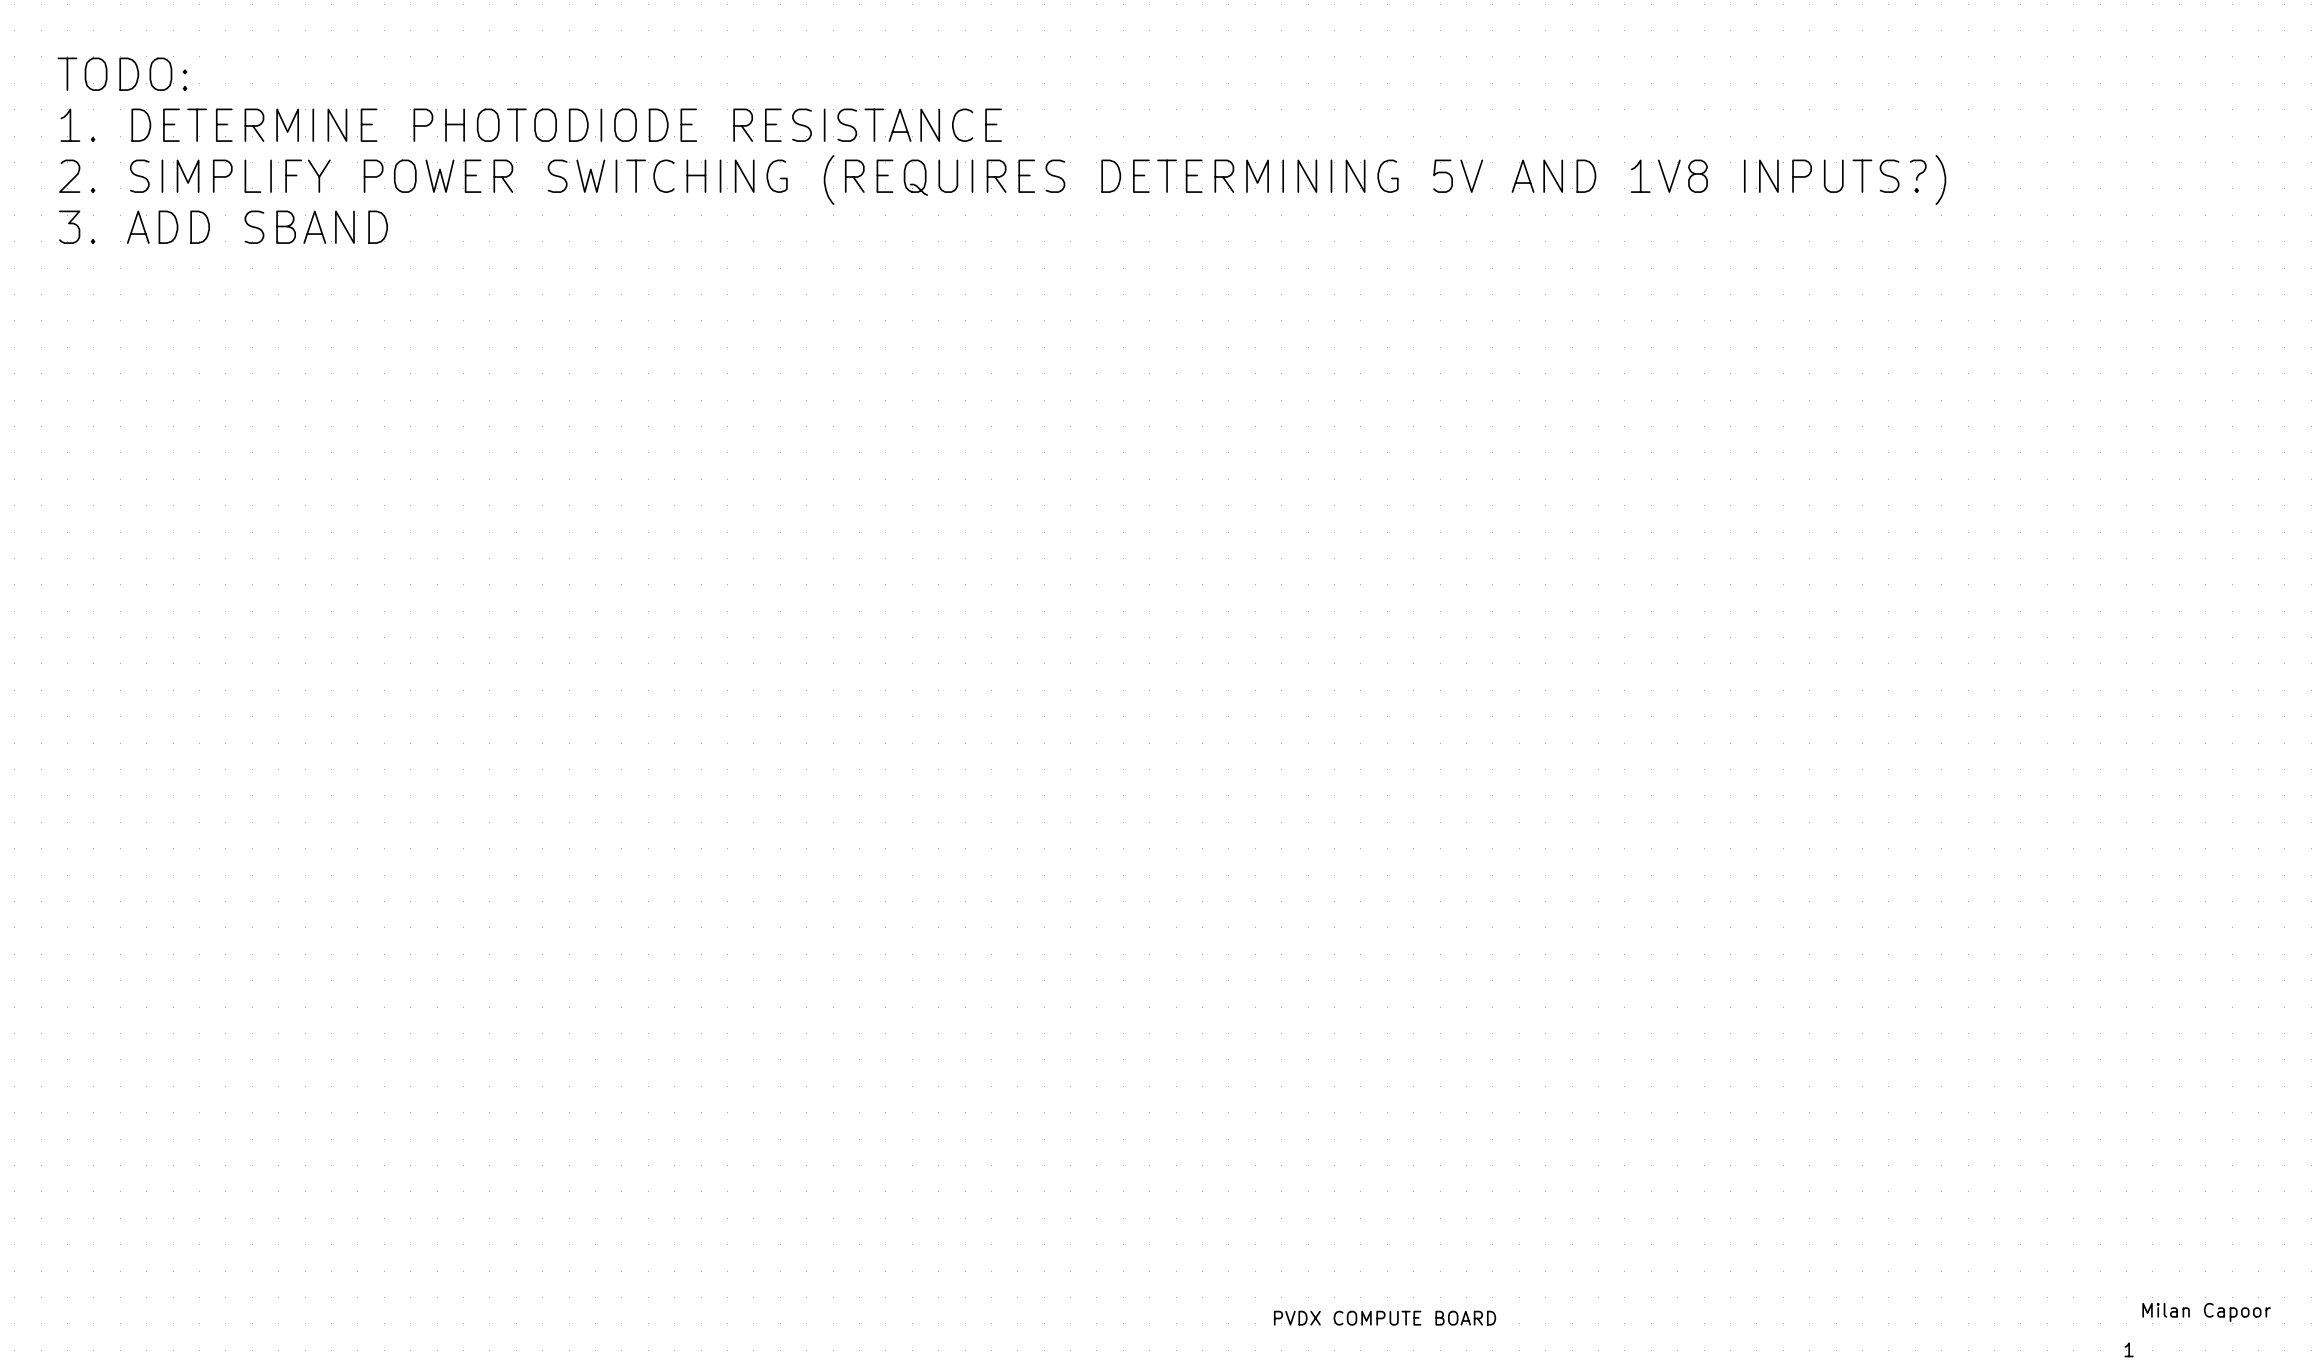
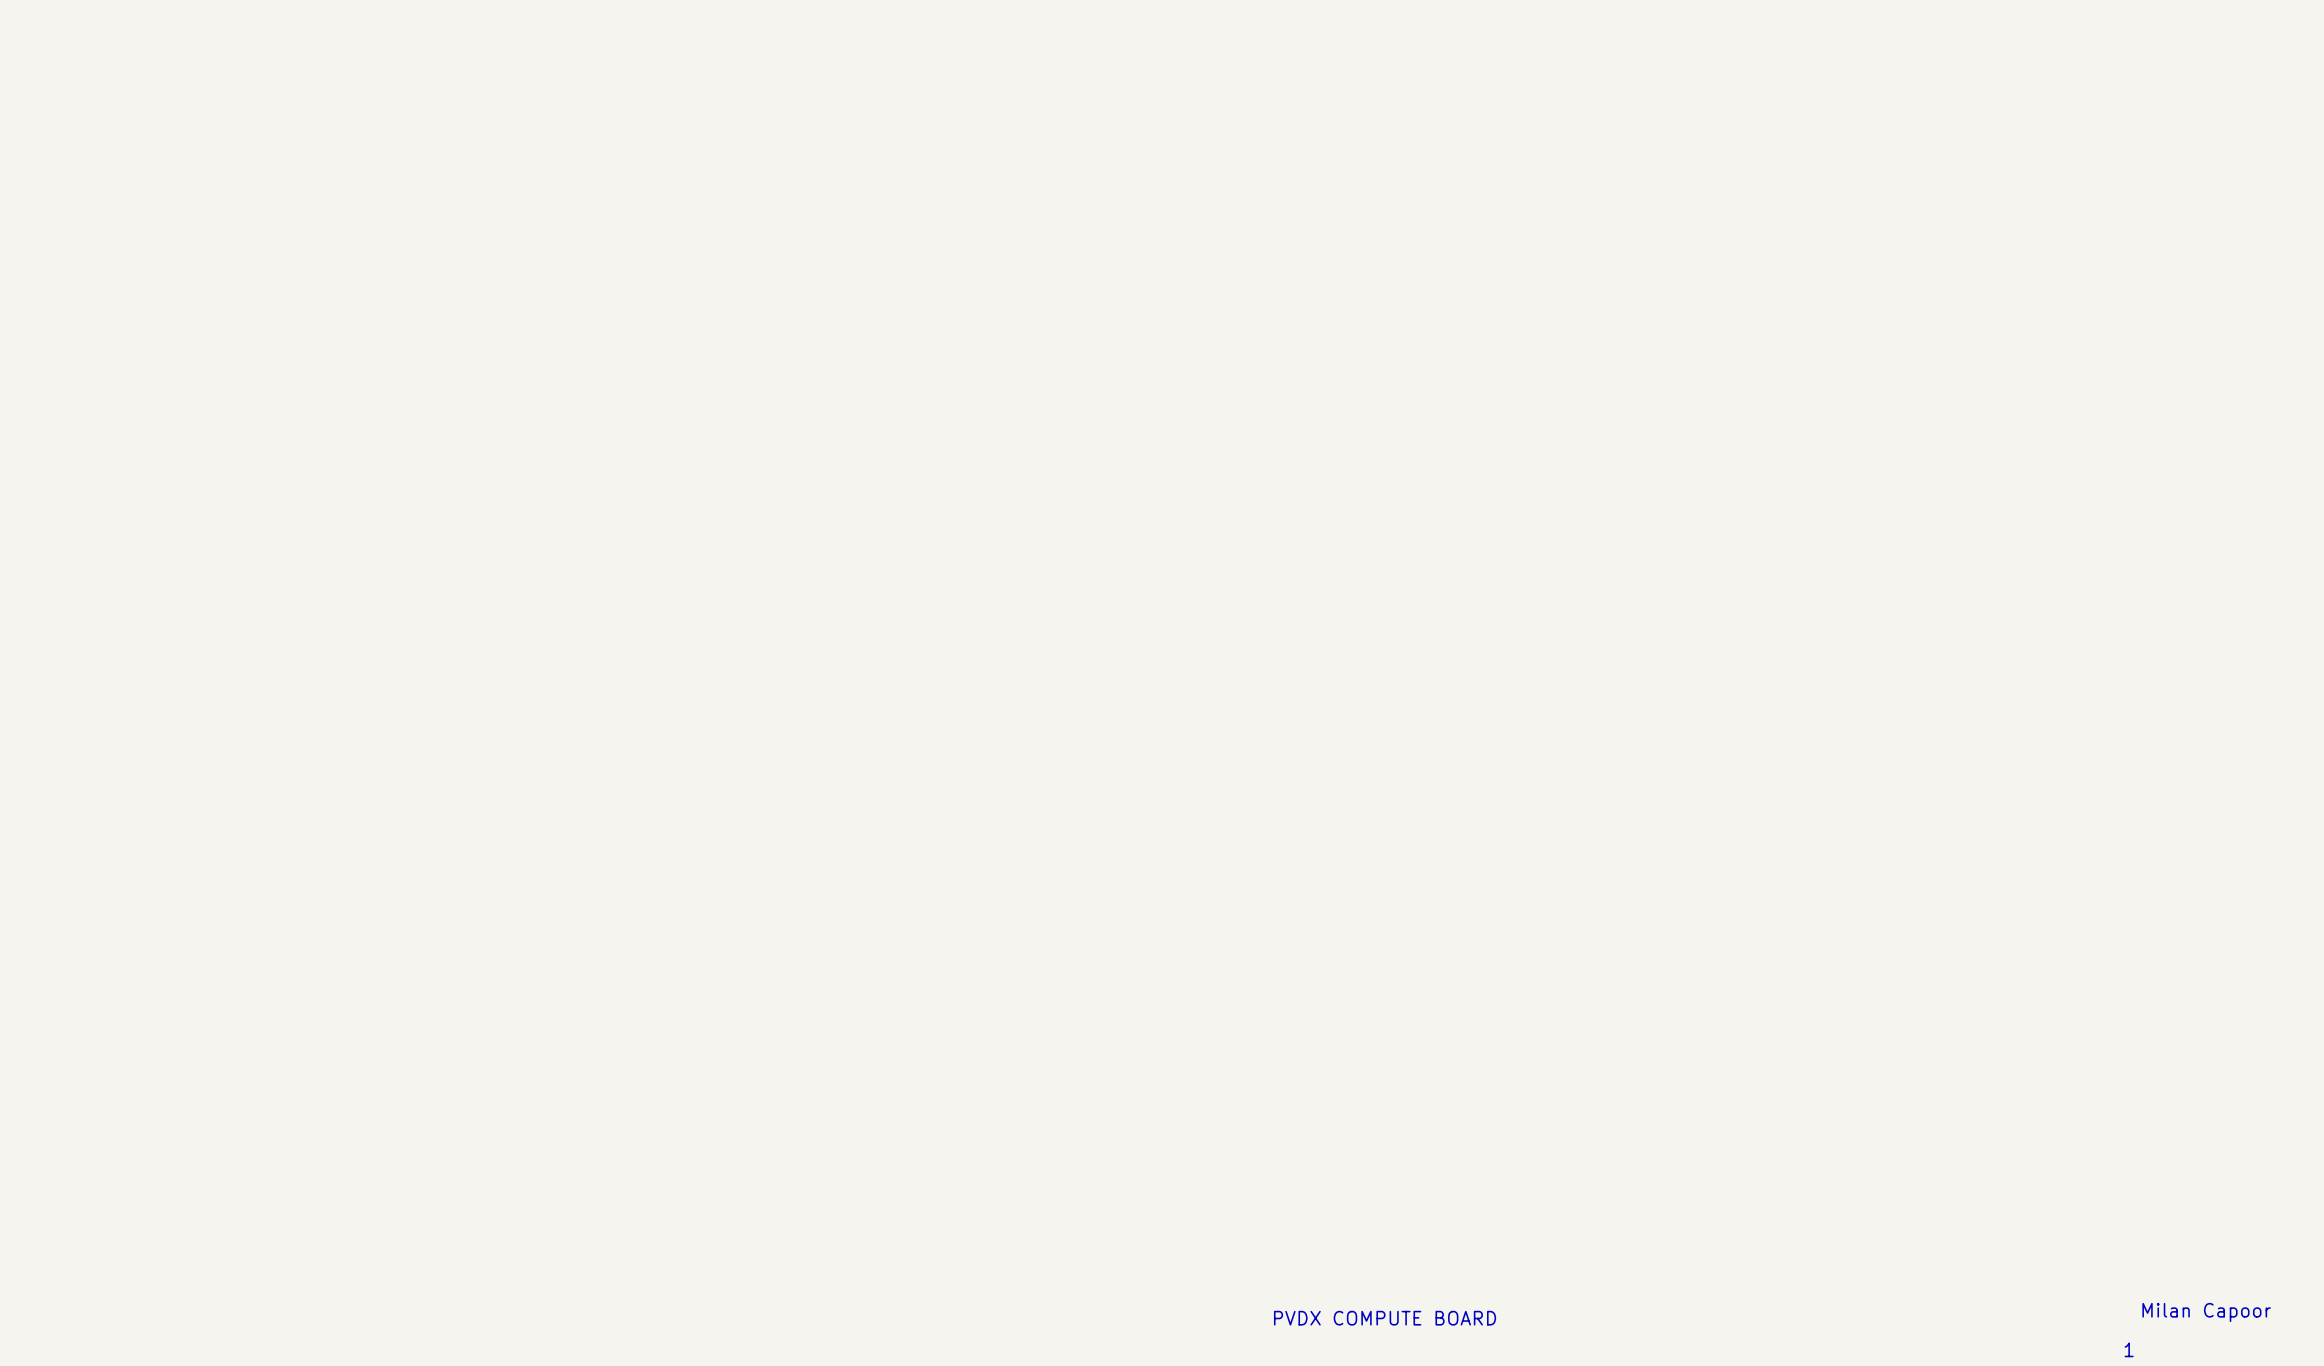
text: TODO: (122, 74) -> none
text: 1. DETERMINE PHOTODIODE RESISTANCE (531, 125) -> none
text: 2. SIMPLIFY POWER SWITCHING (REQUIRES DETERMINING 5V AND 1V8 INPUTS?) (1002, 180) -> none
text: 3. ADD SBAND (223, 227) -> none

